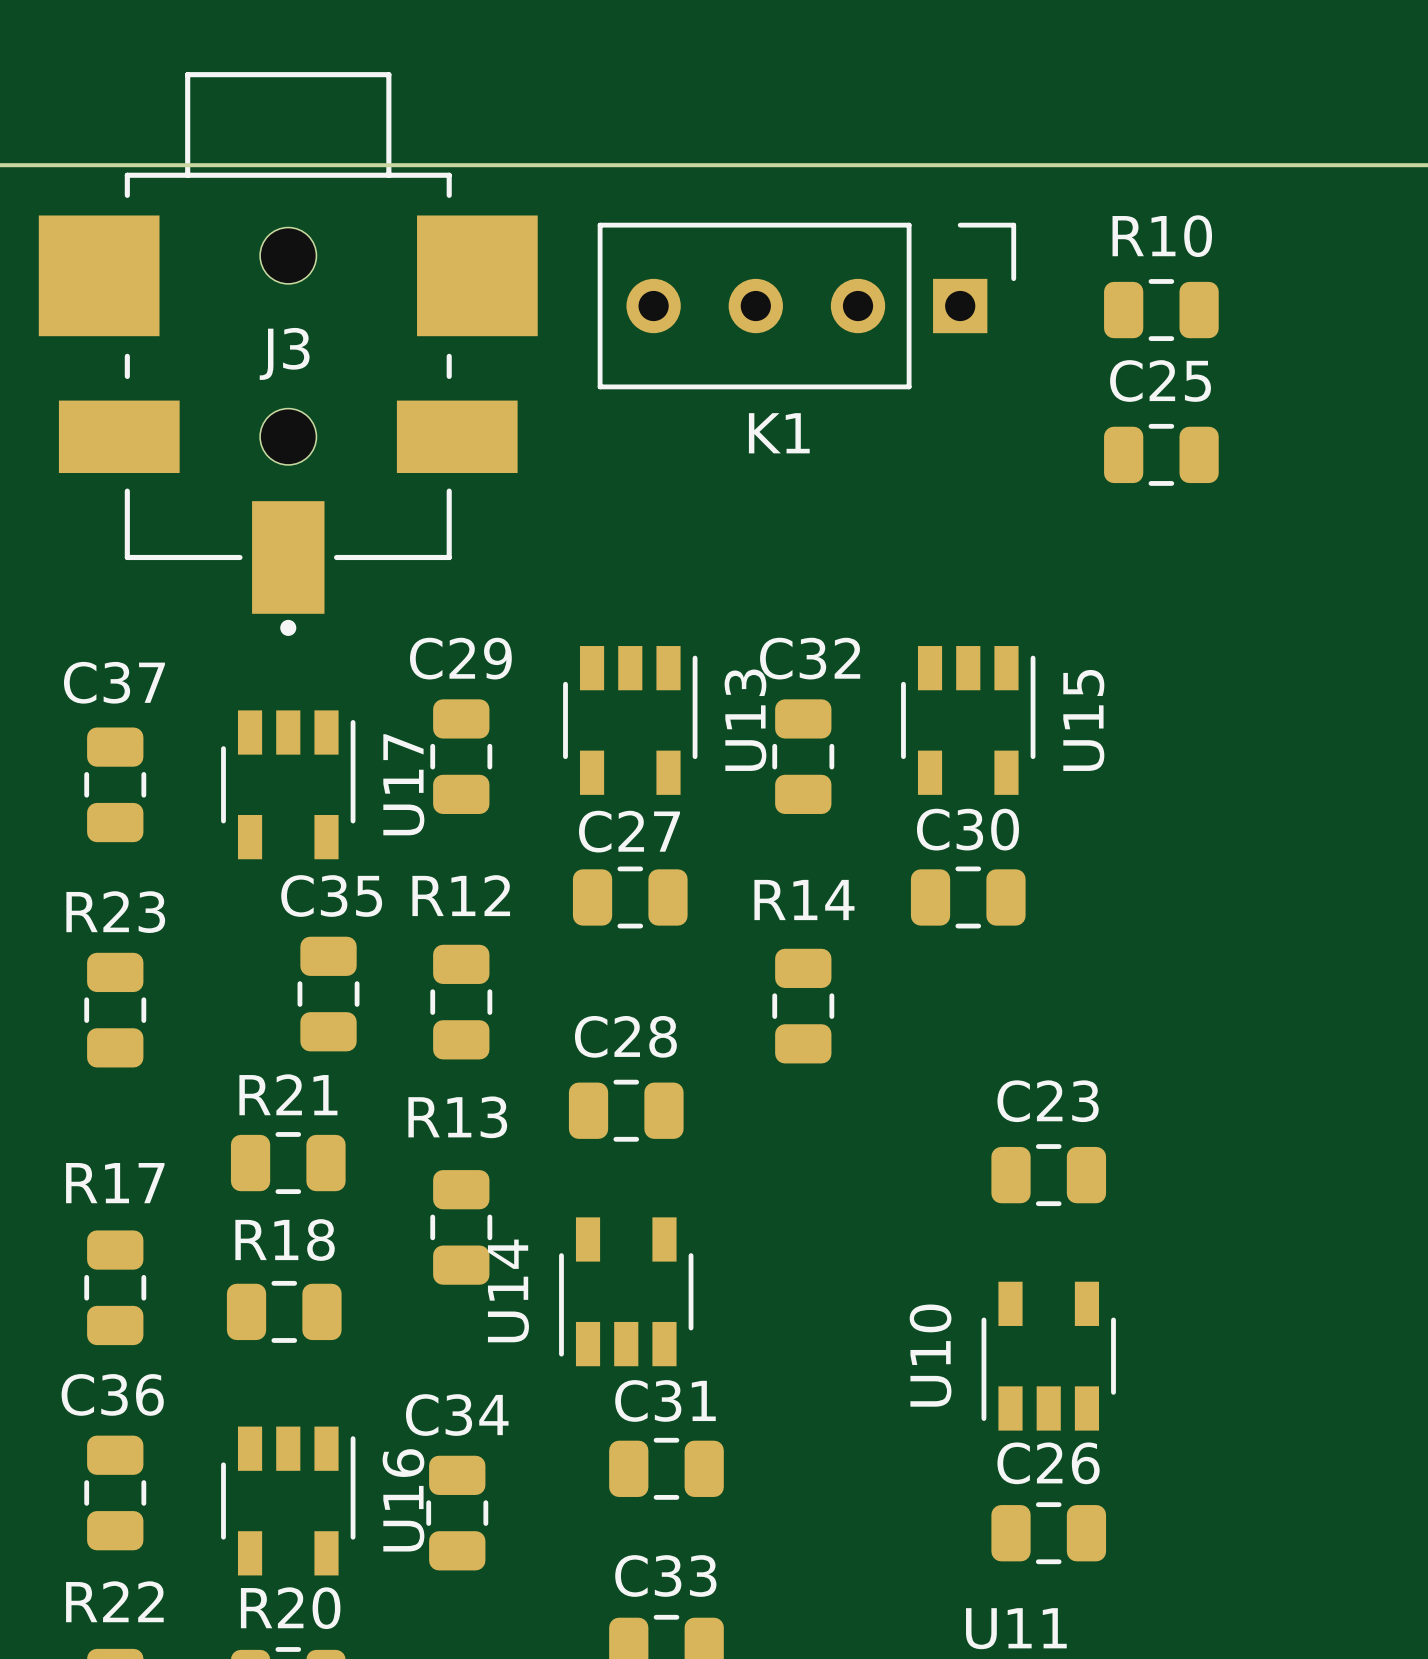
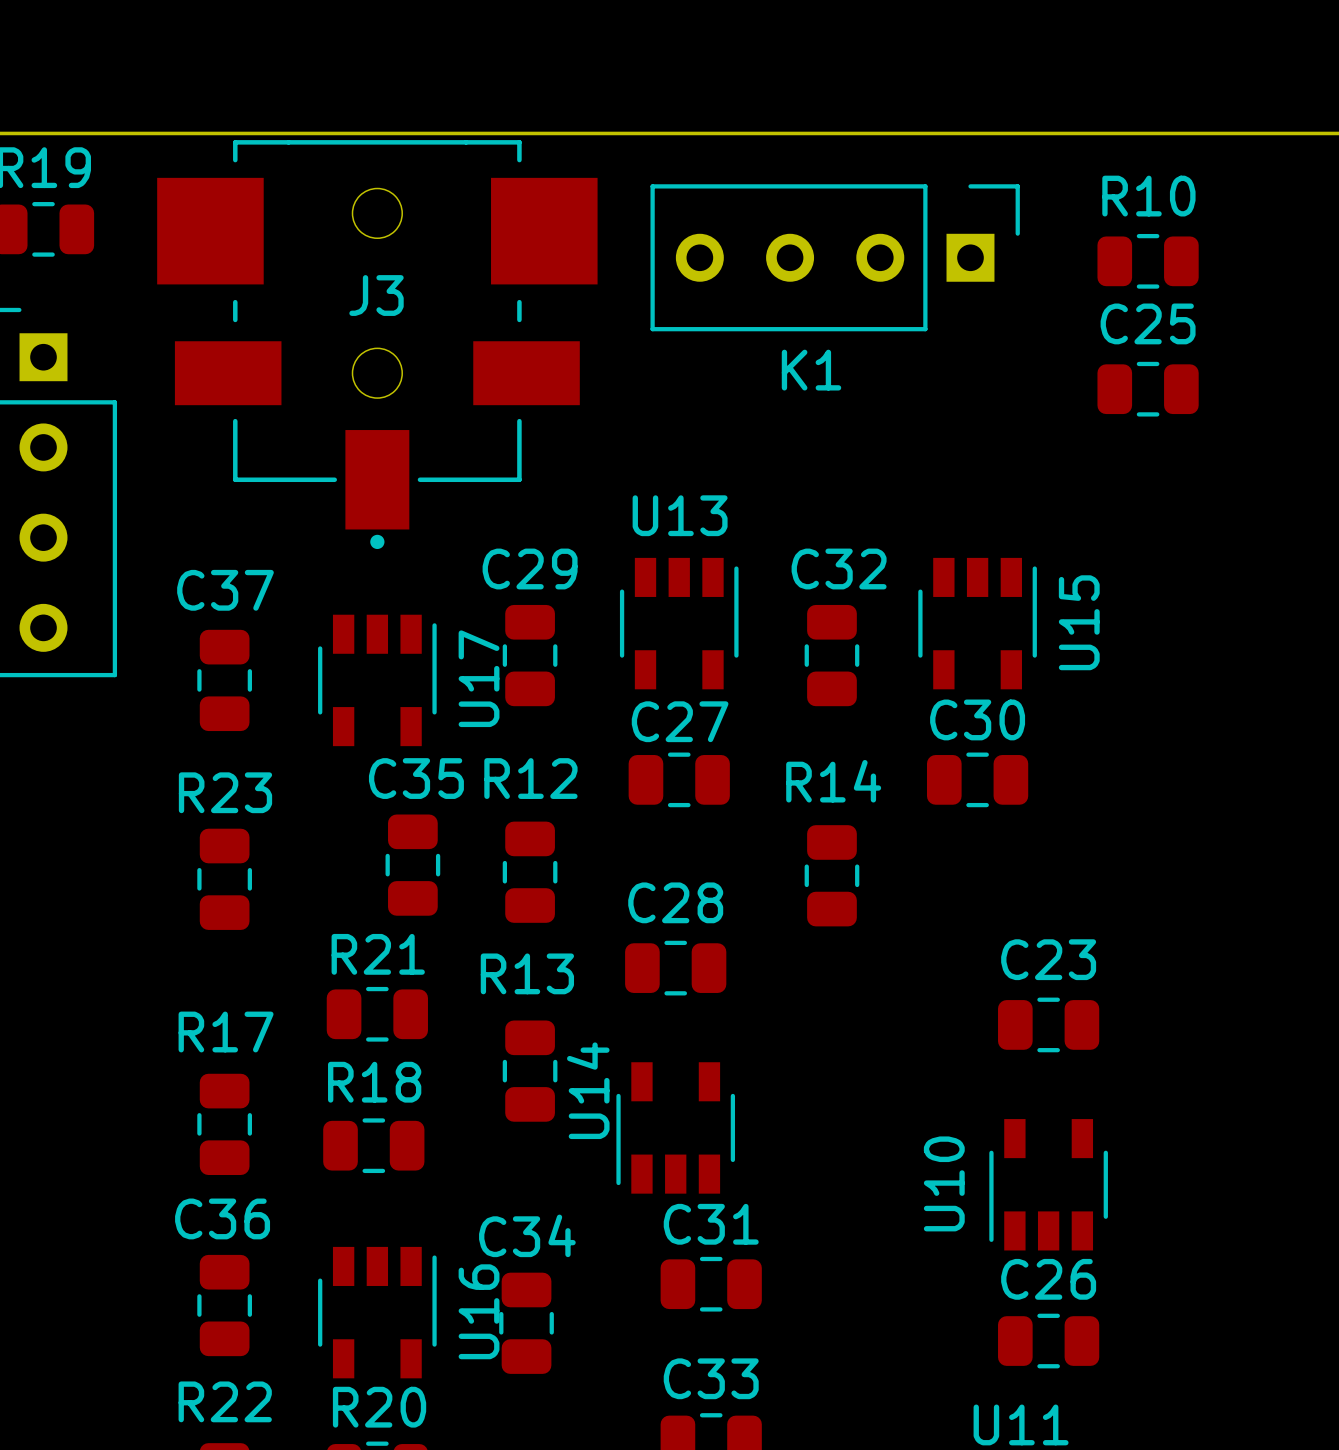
J3 footprint: [38, 72, 538, 636] -> [157, 140, 598, 550]
U13 name rotation: 0° (745, 720) -> 90° clockwise (680, 515)
U13 name position: U13 (745, 720) -> U13 (680, 515)
U14 name position: U14 (508, 1290) -> U14 (588, 1090)

